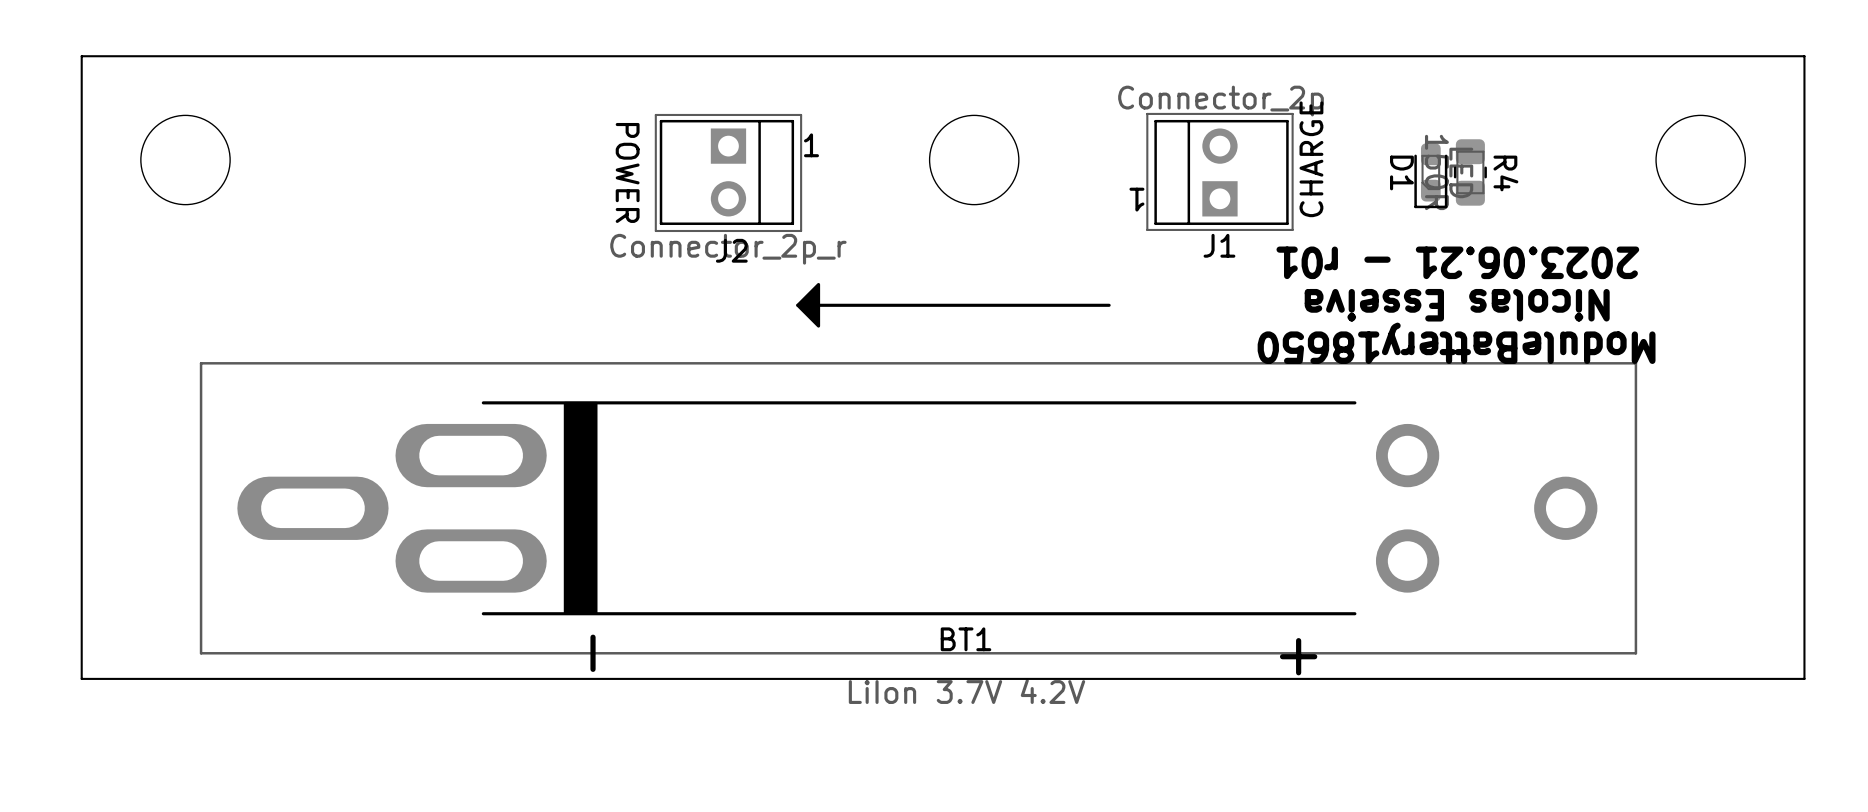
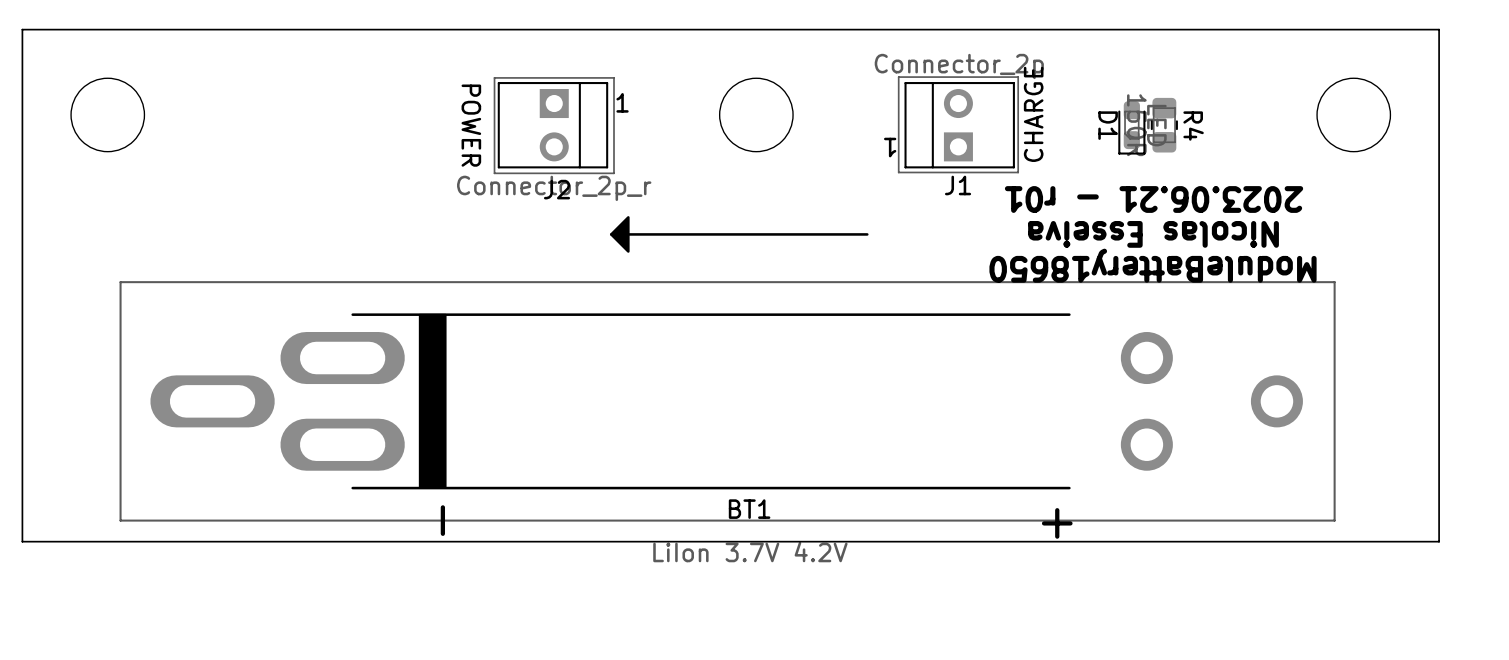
BT1 footprint: [199, 362, 1638, 655] -> [119, 281, 1336, 522]

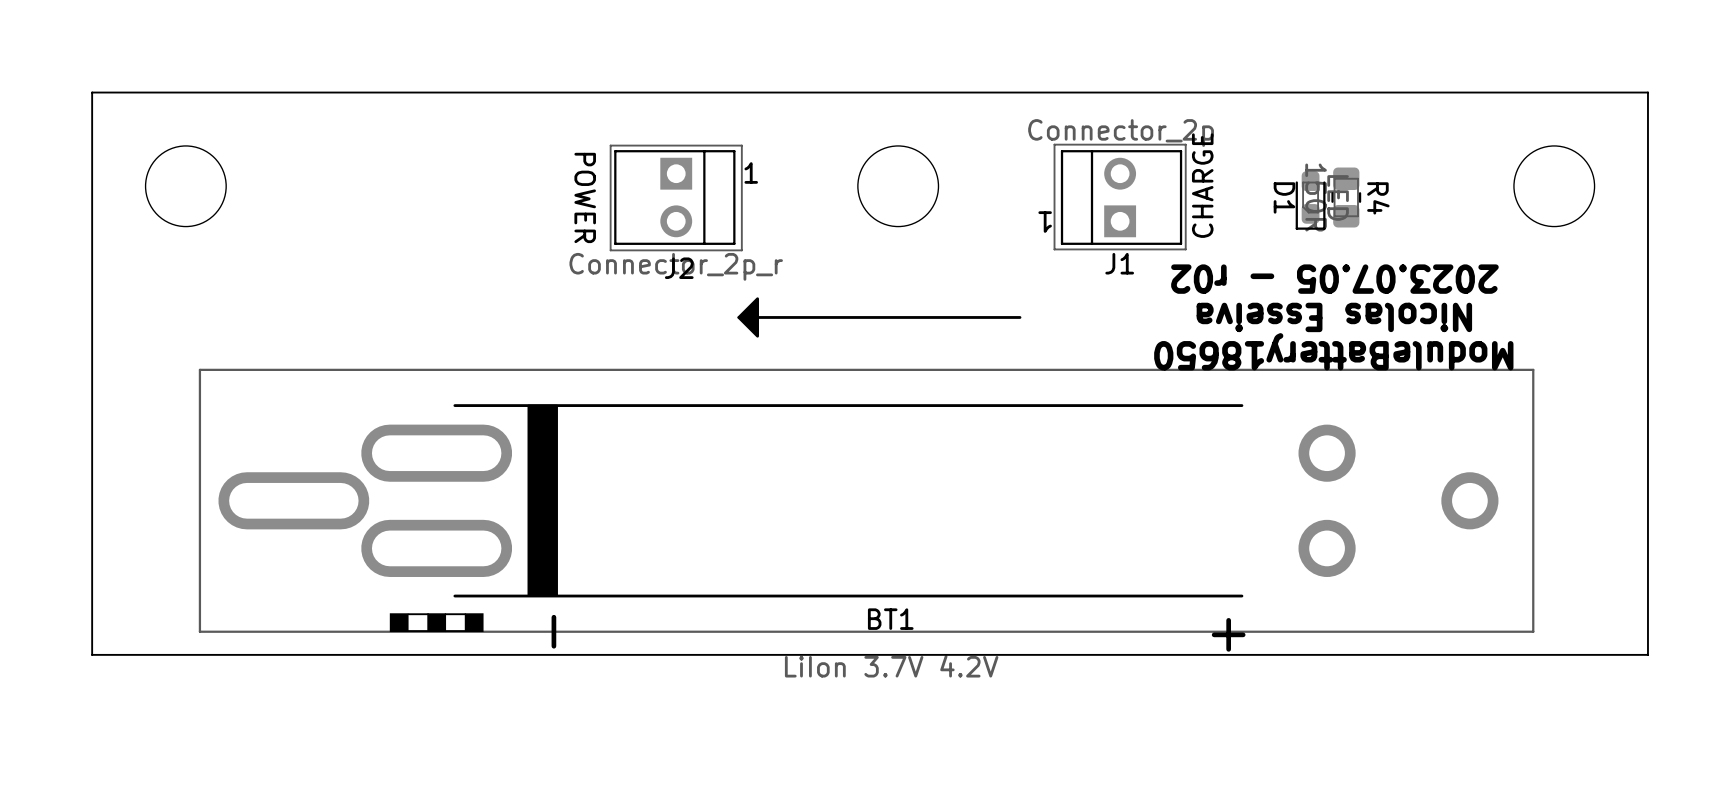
text: 2023.06.21 - r01 (1154, 199) -> 2023.07.05 - r02 (1334, 279)
BT1 footprint: [119, 281, 1336, 522] -> [198, 368, 1535, 633]

